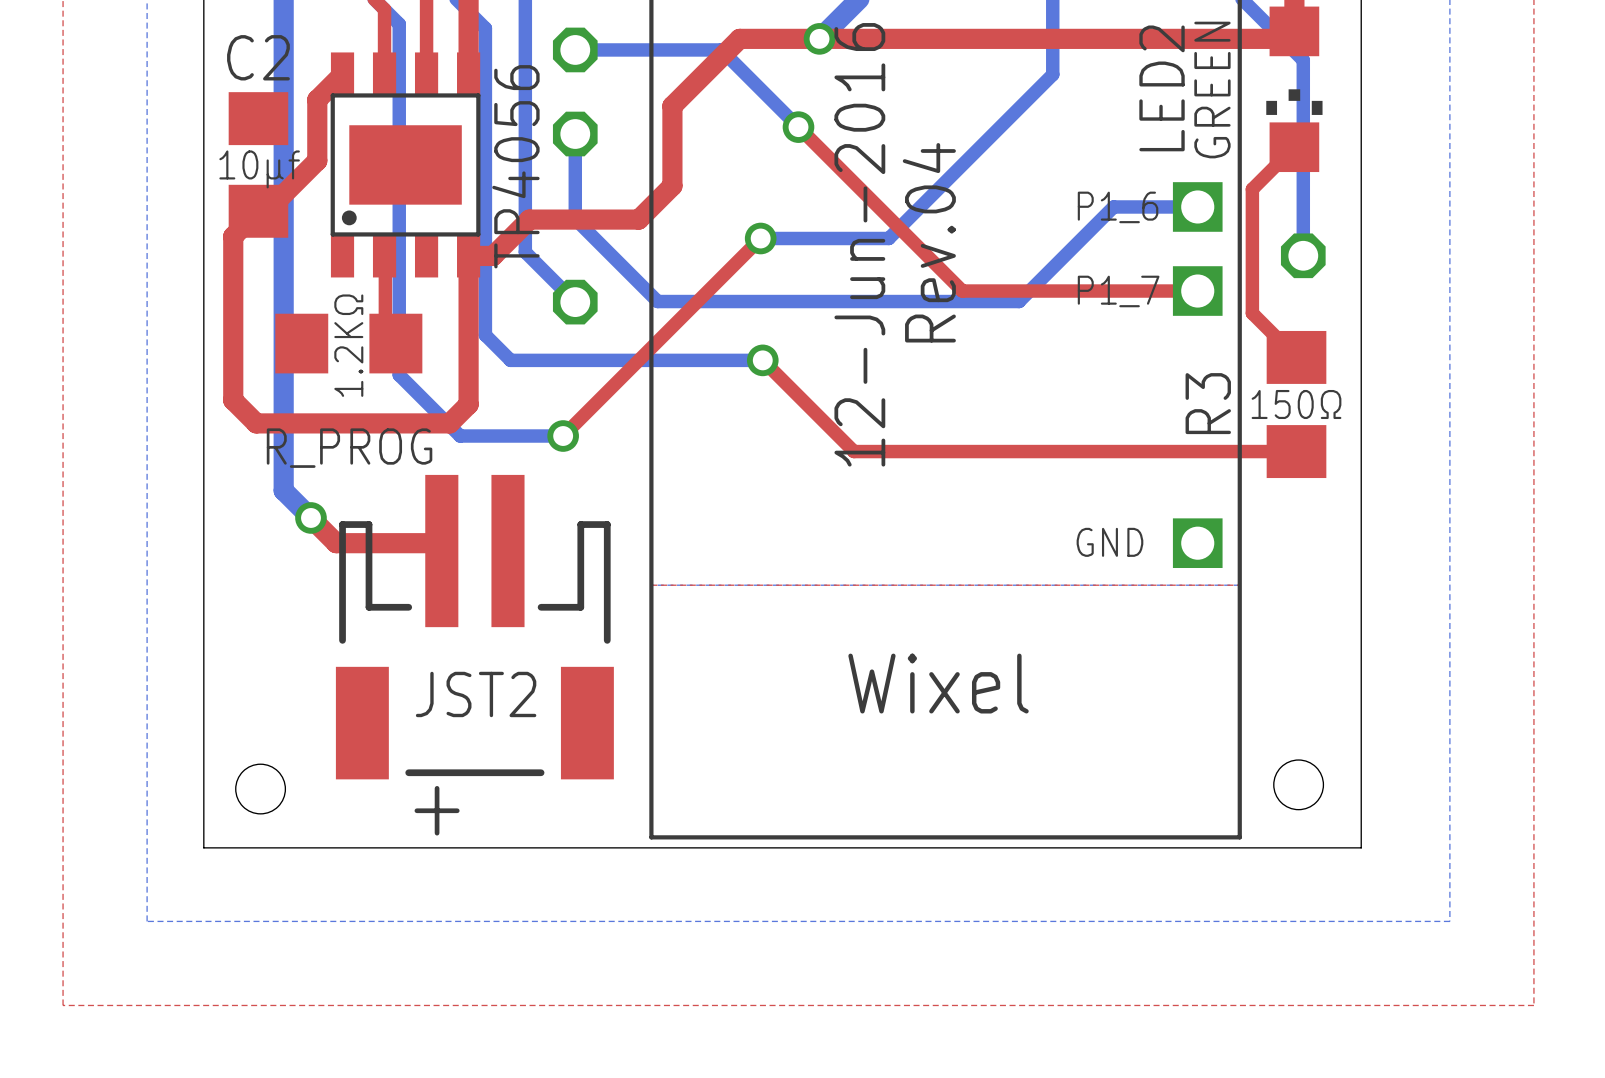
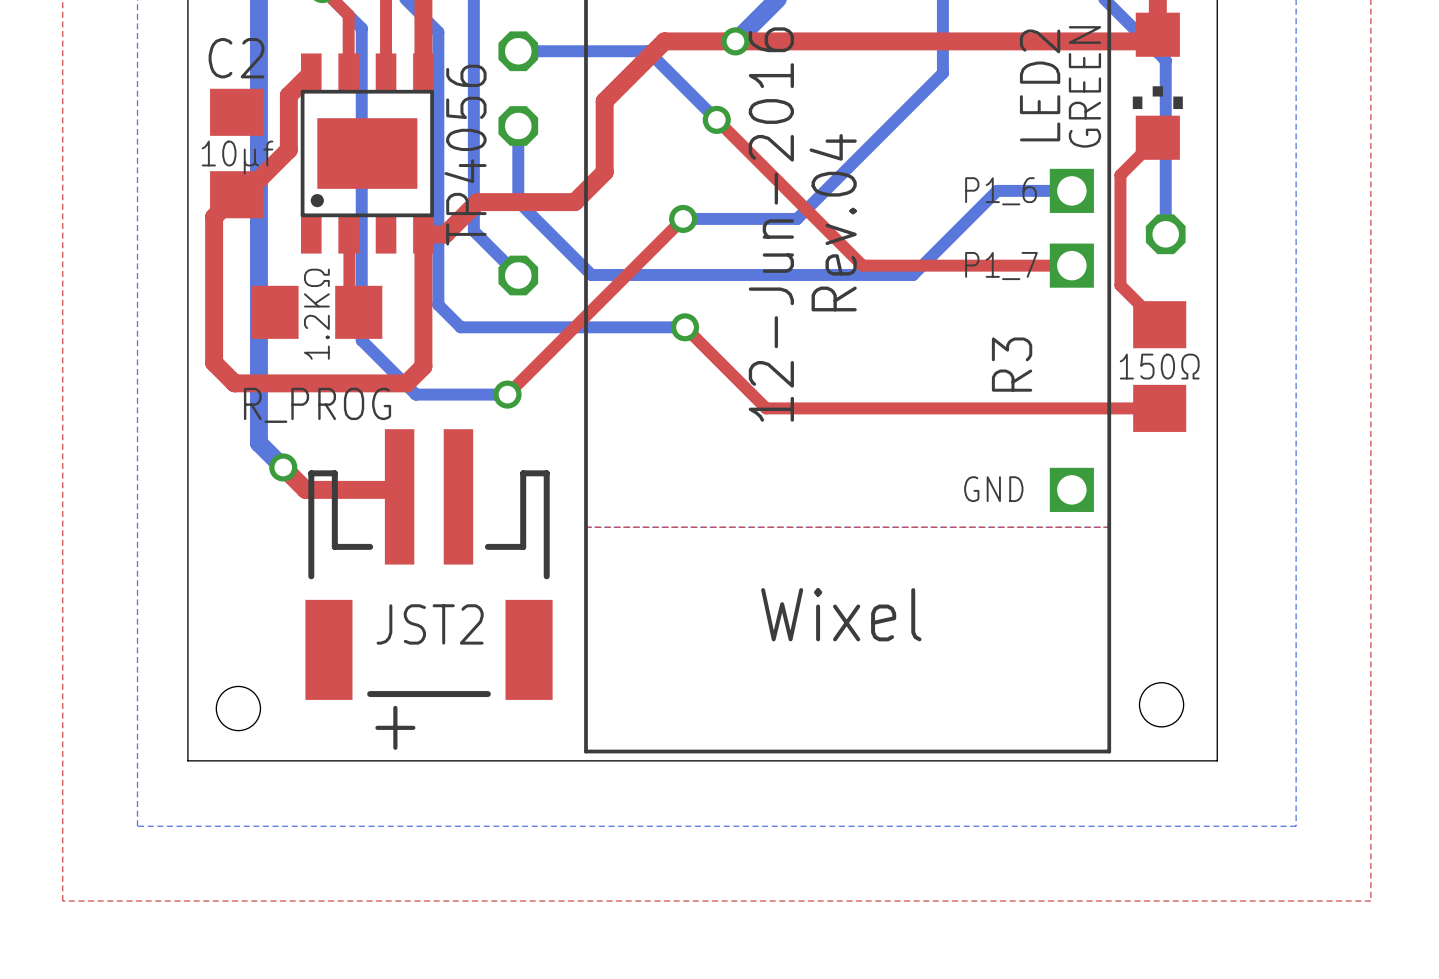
R3 name position: R3 (1208, 403) -> R3 (1012, 364)

